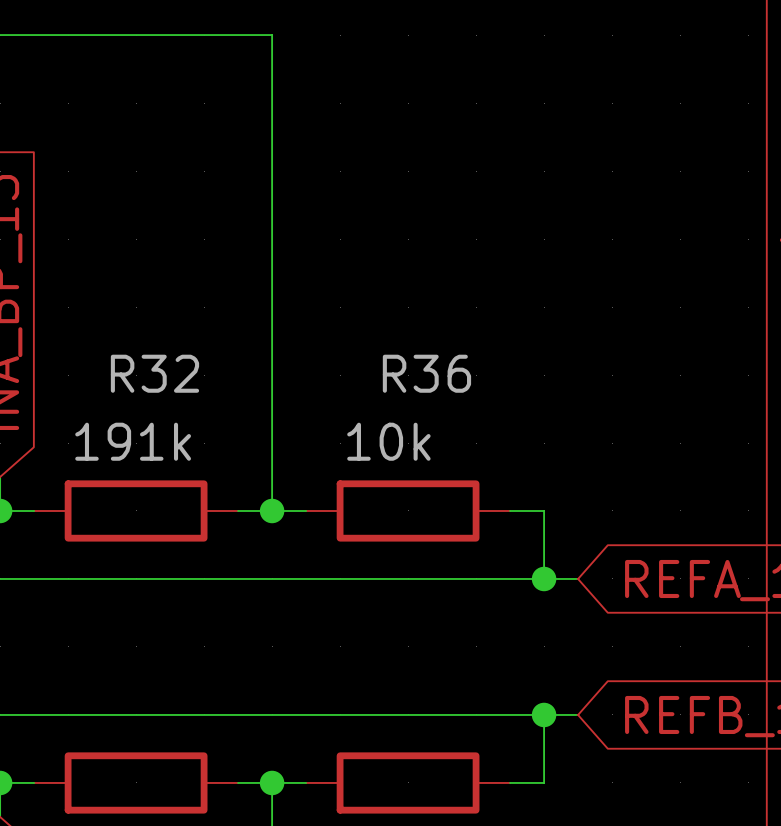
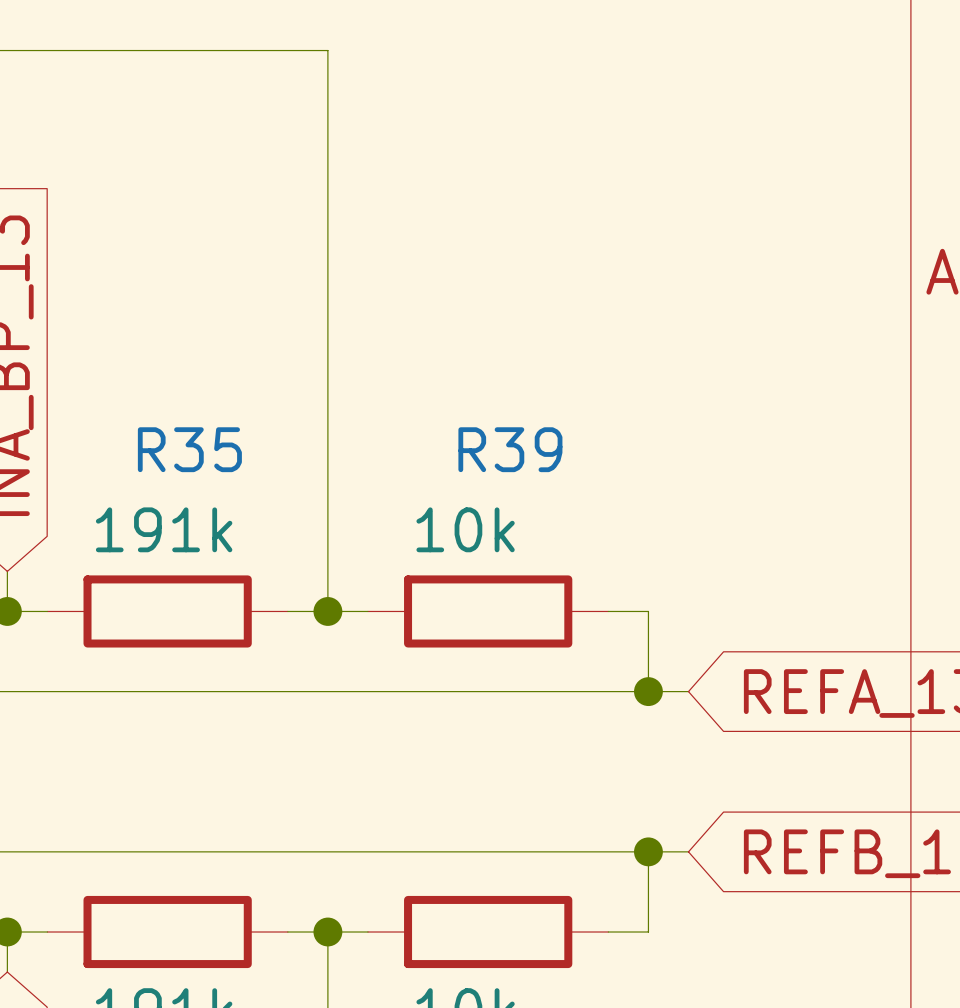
R32 name: R32 (154, 373) -> R35 (189, 449)
R36 name: R36 (426, 373) -> R39 (510, 449)

